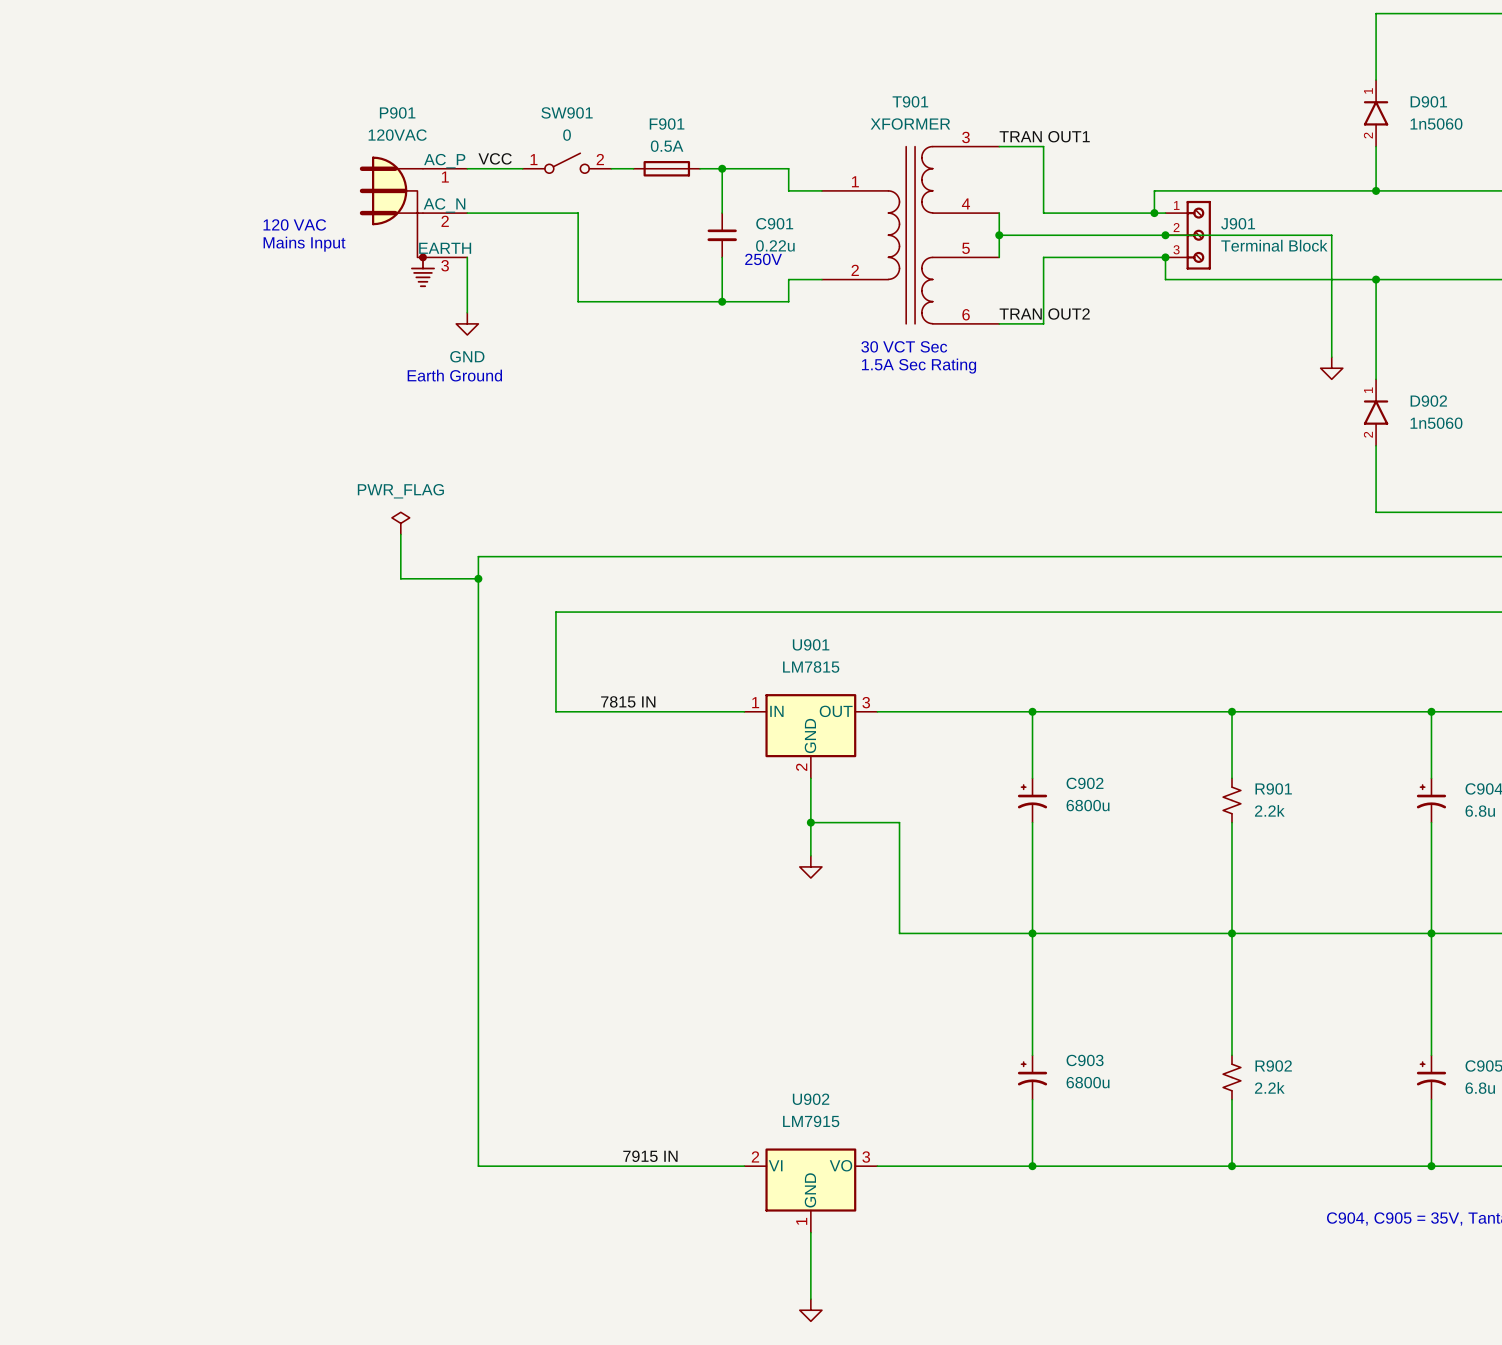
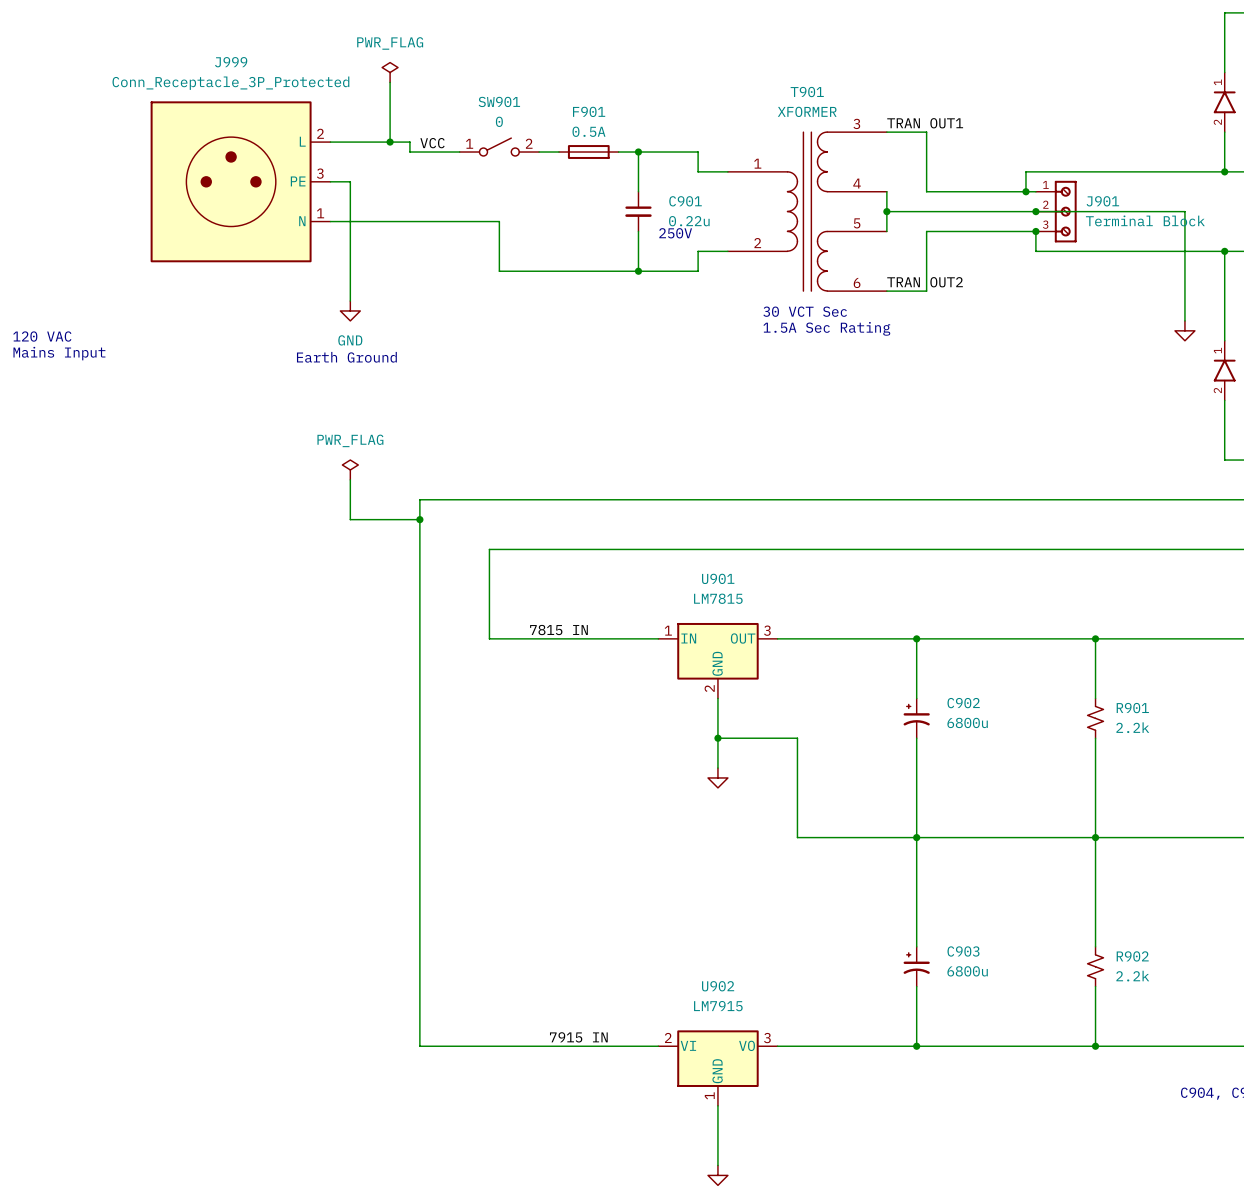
power symbol: none -> PWR_FLAG (390, 72)
wire: none -> (390, 82) (390, 142)
wire: none -> (330, 142) (409, 142) (409, 152)
junction: none -> (390, 142)
J999: none -> Conn_Receptacle_3P_Protected (240, 181)
wire: none -> (330, 181) (350, 181) (350, 301)
wire: (467, 213) (578, 213) (578, 301) -> (330, 221) (499, 221) (499, 271) (509, 271)
P901: 120VAC (413, 221) -> none
text: 120 VAC (294, 224) -> none
text: Mains Input (304, 244) -> none
wire: (467, 257) (467, 312) -> none
power symbol position: GND (467, 323) -> GND (350, 310)
text: none -> 120 VAC (42, 336)
text position: Earth Ground (454, 375) -> Earth Ground (346, 357)
text: none -> Mains Input (59, 353)

